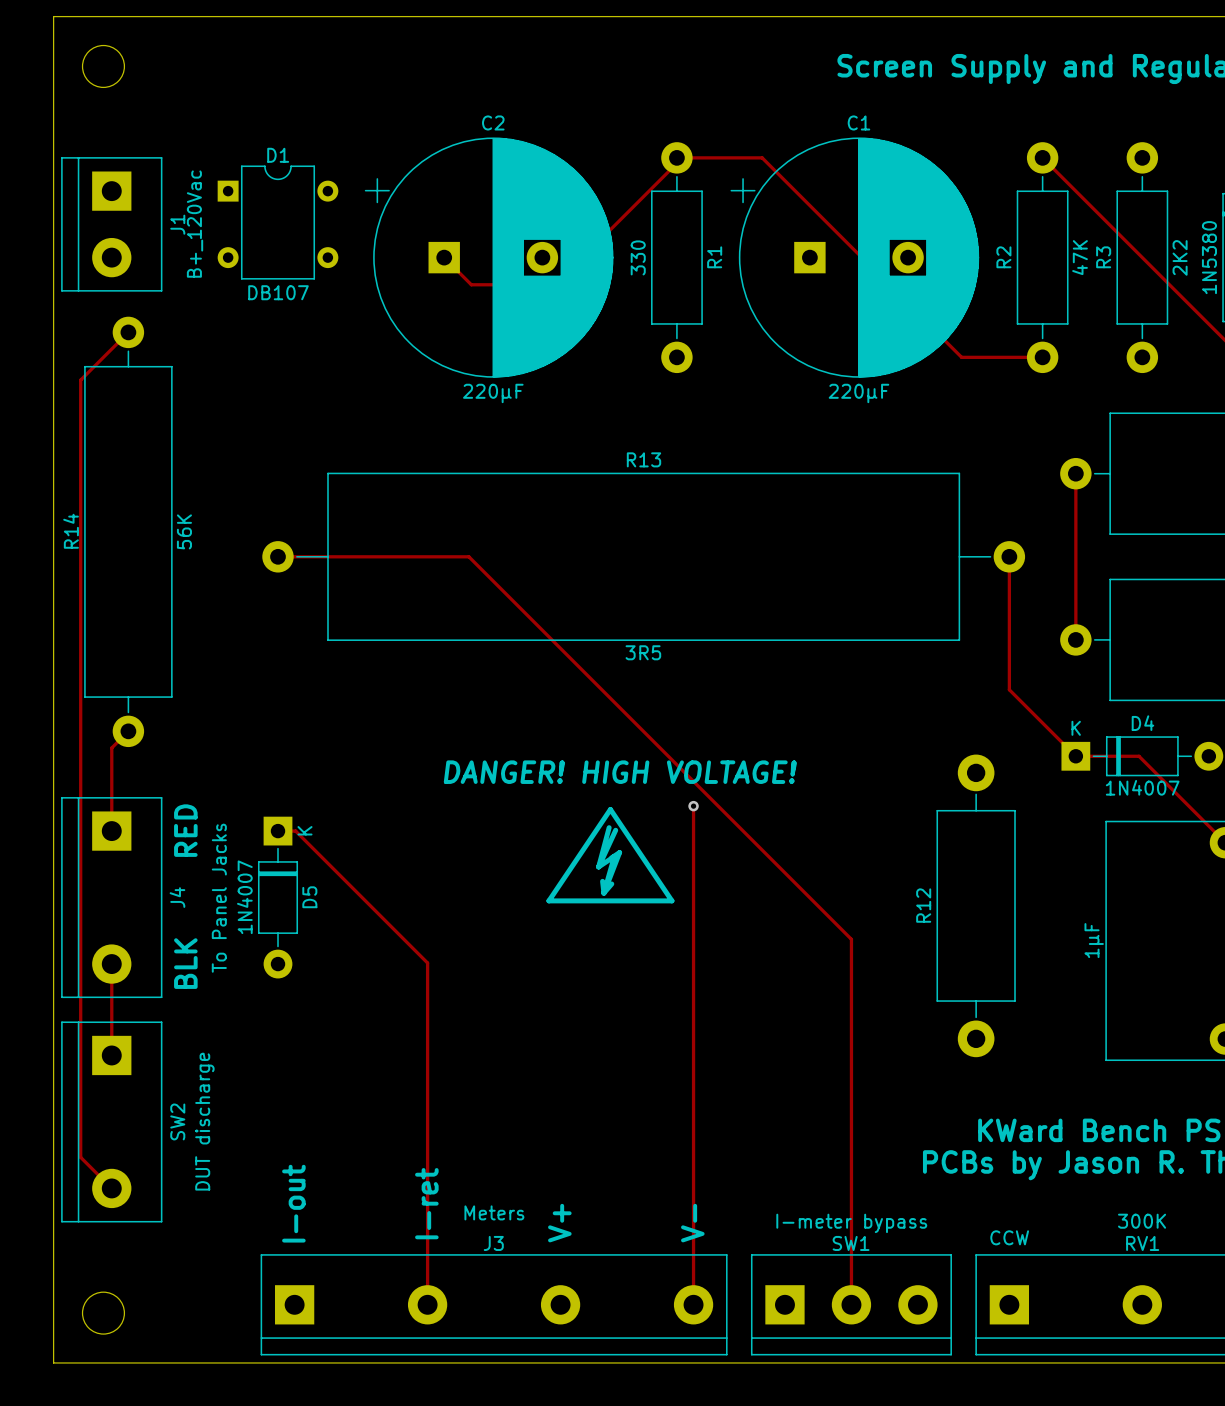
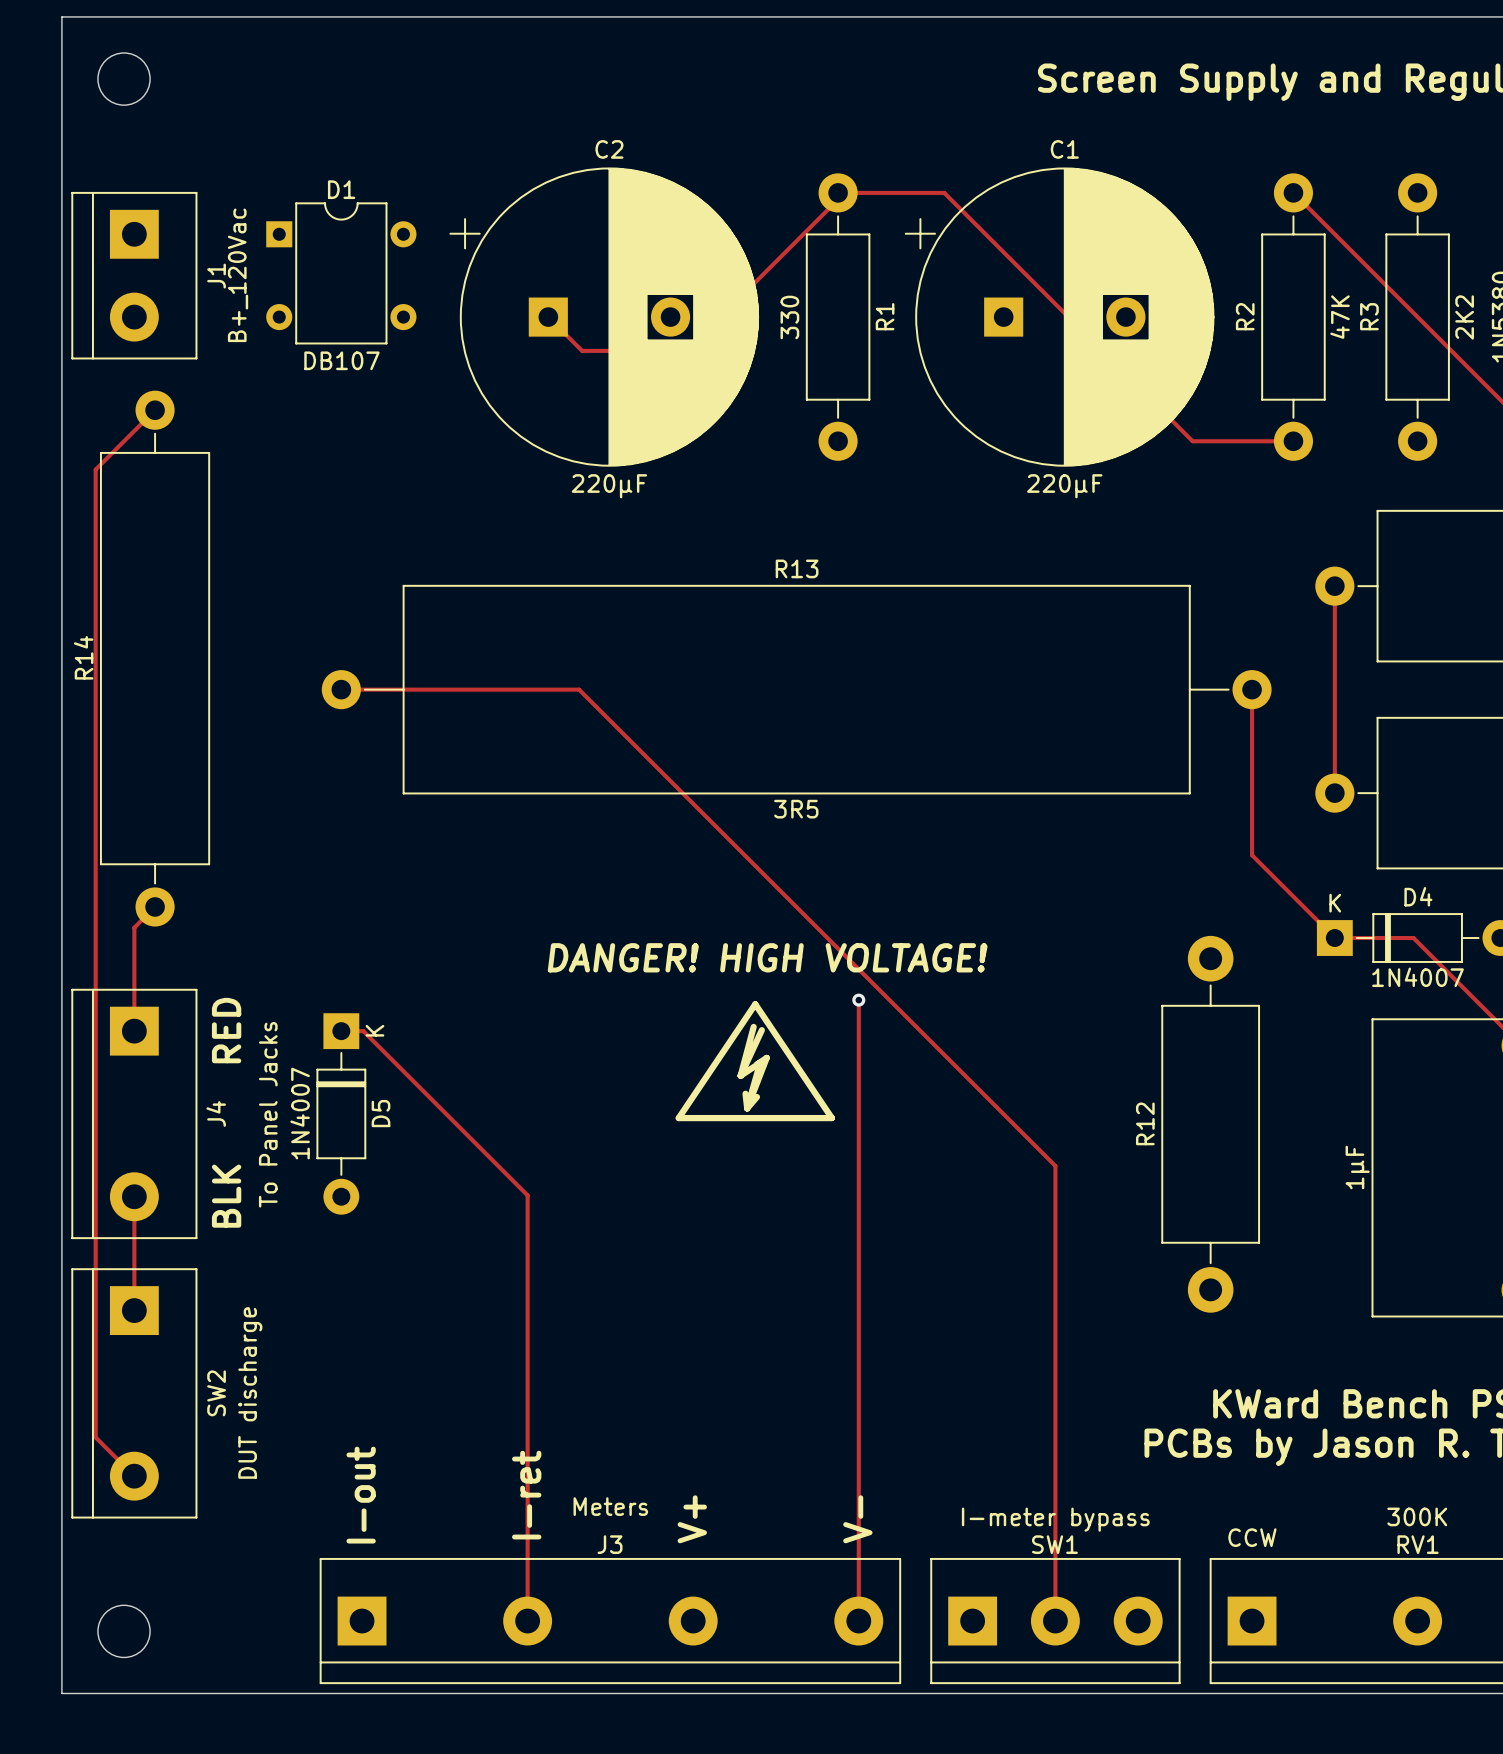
R14 value: 56K (184, 531) -> none

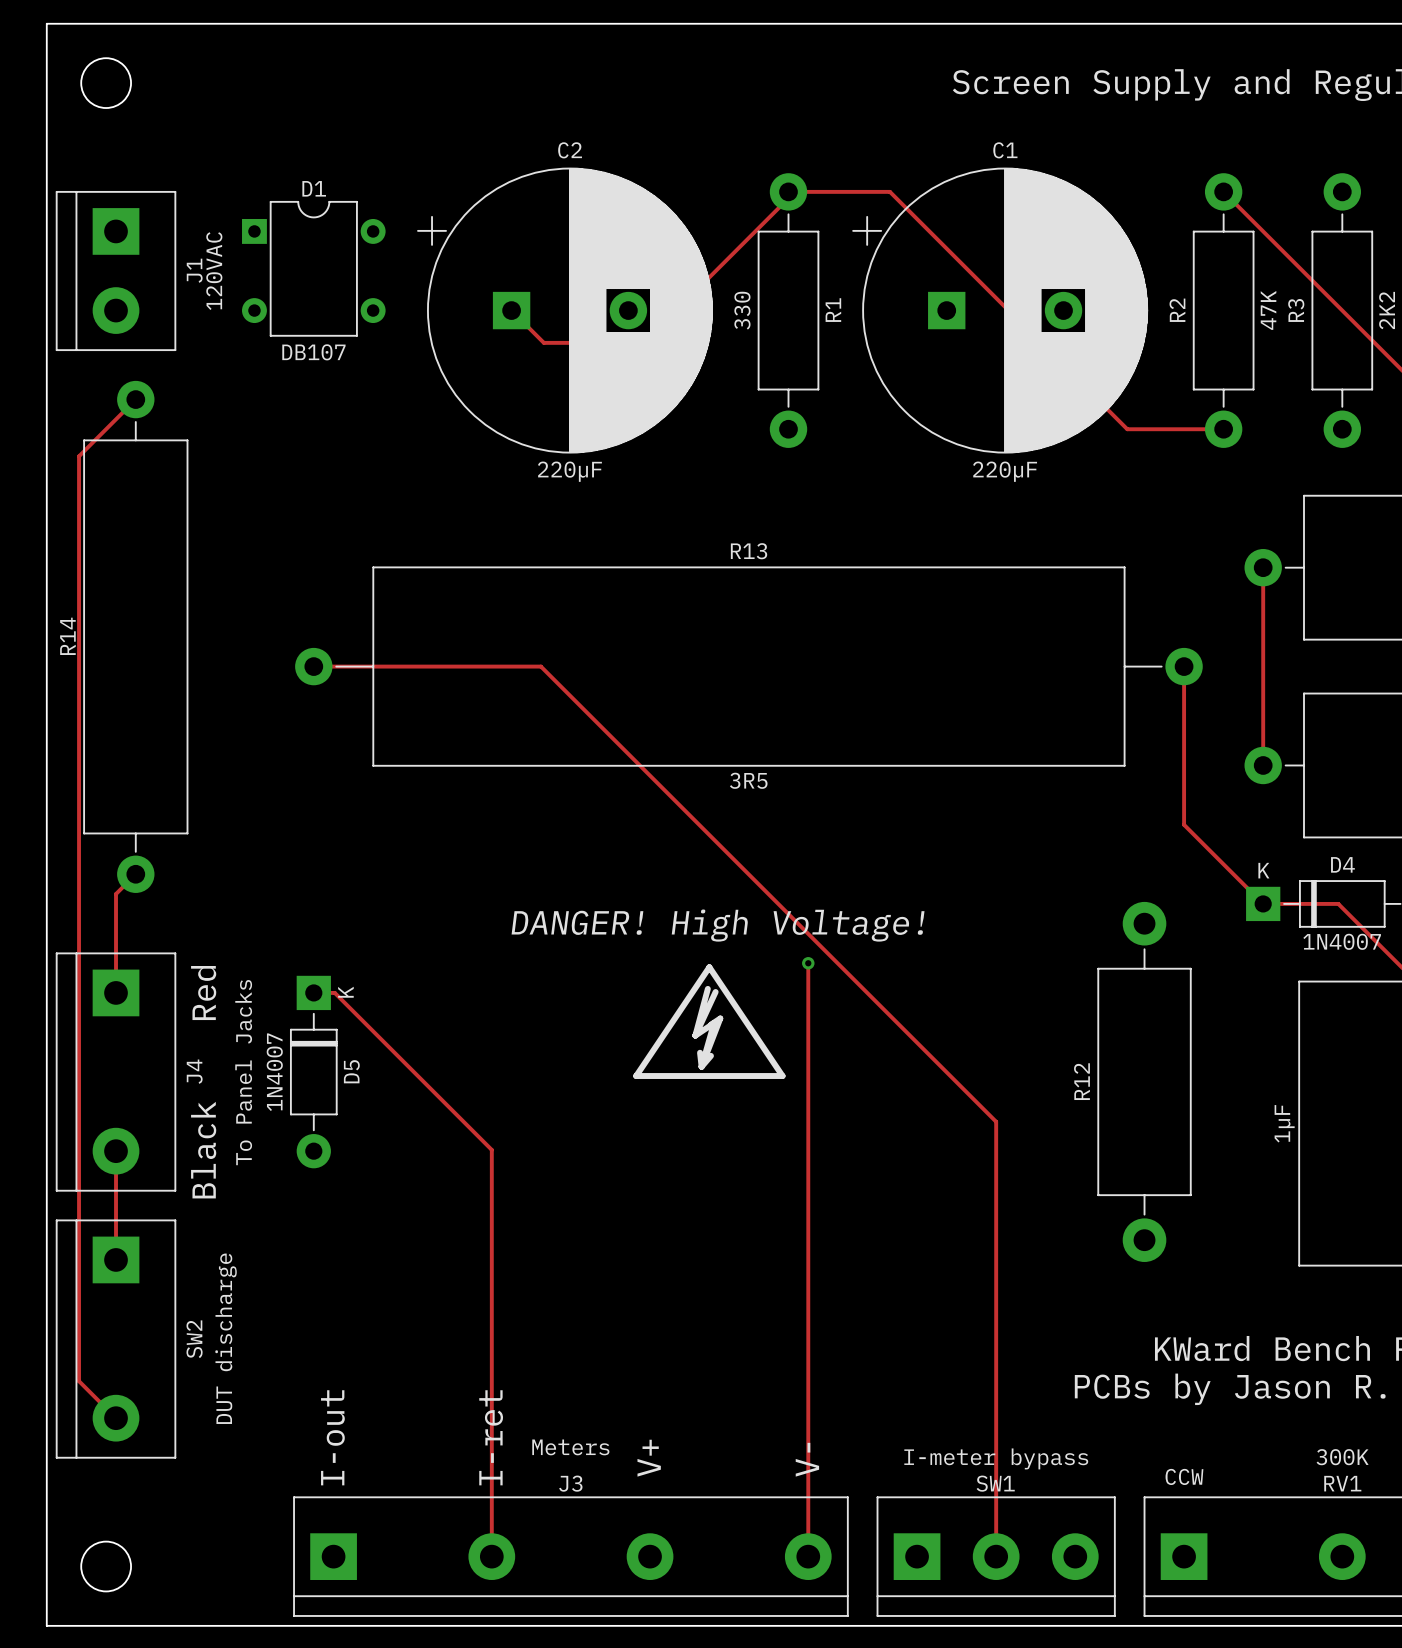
J1 value: B+_120Vac (238, 275) -> 120VAC (214, 271)
text: DANGER! HIGH VOLTAGE! (767, 957) -> DANGER! High Voltage! (718, 925)
text: RED (226, 1030) -> Red (203, 993)
text: BLK (226, 1196) -> Black (203, 1150)

